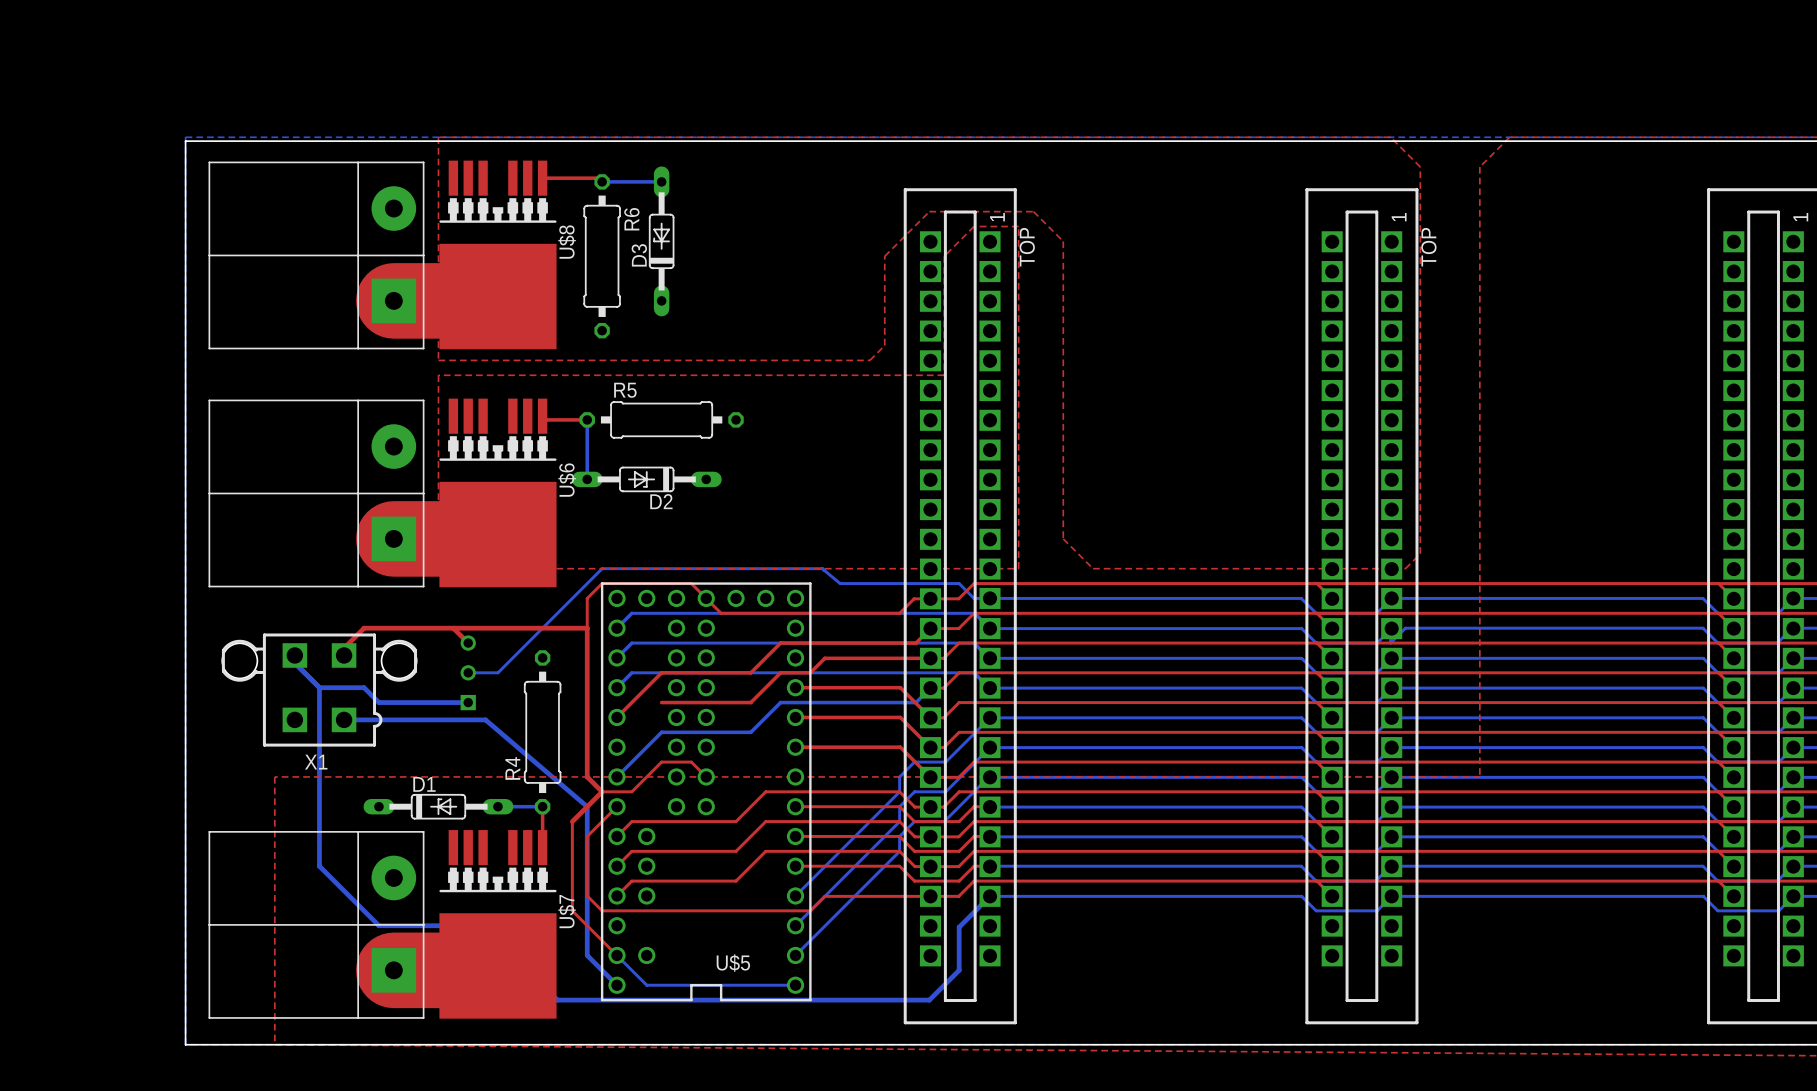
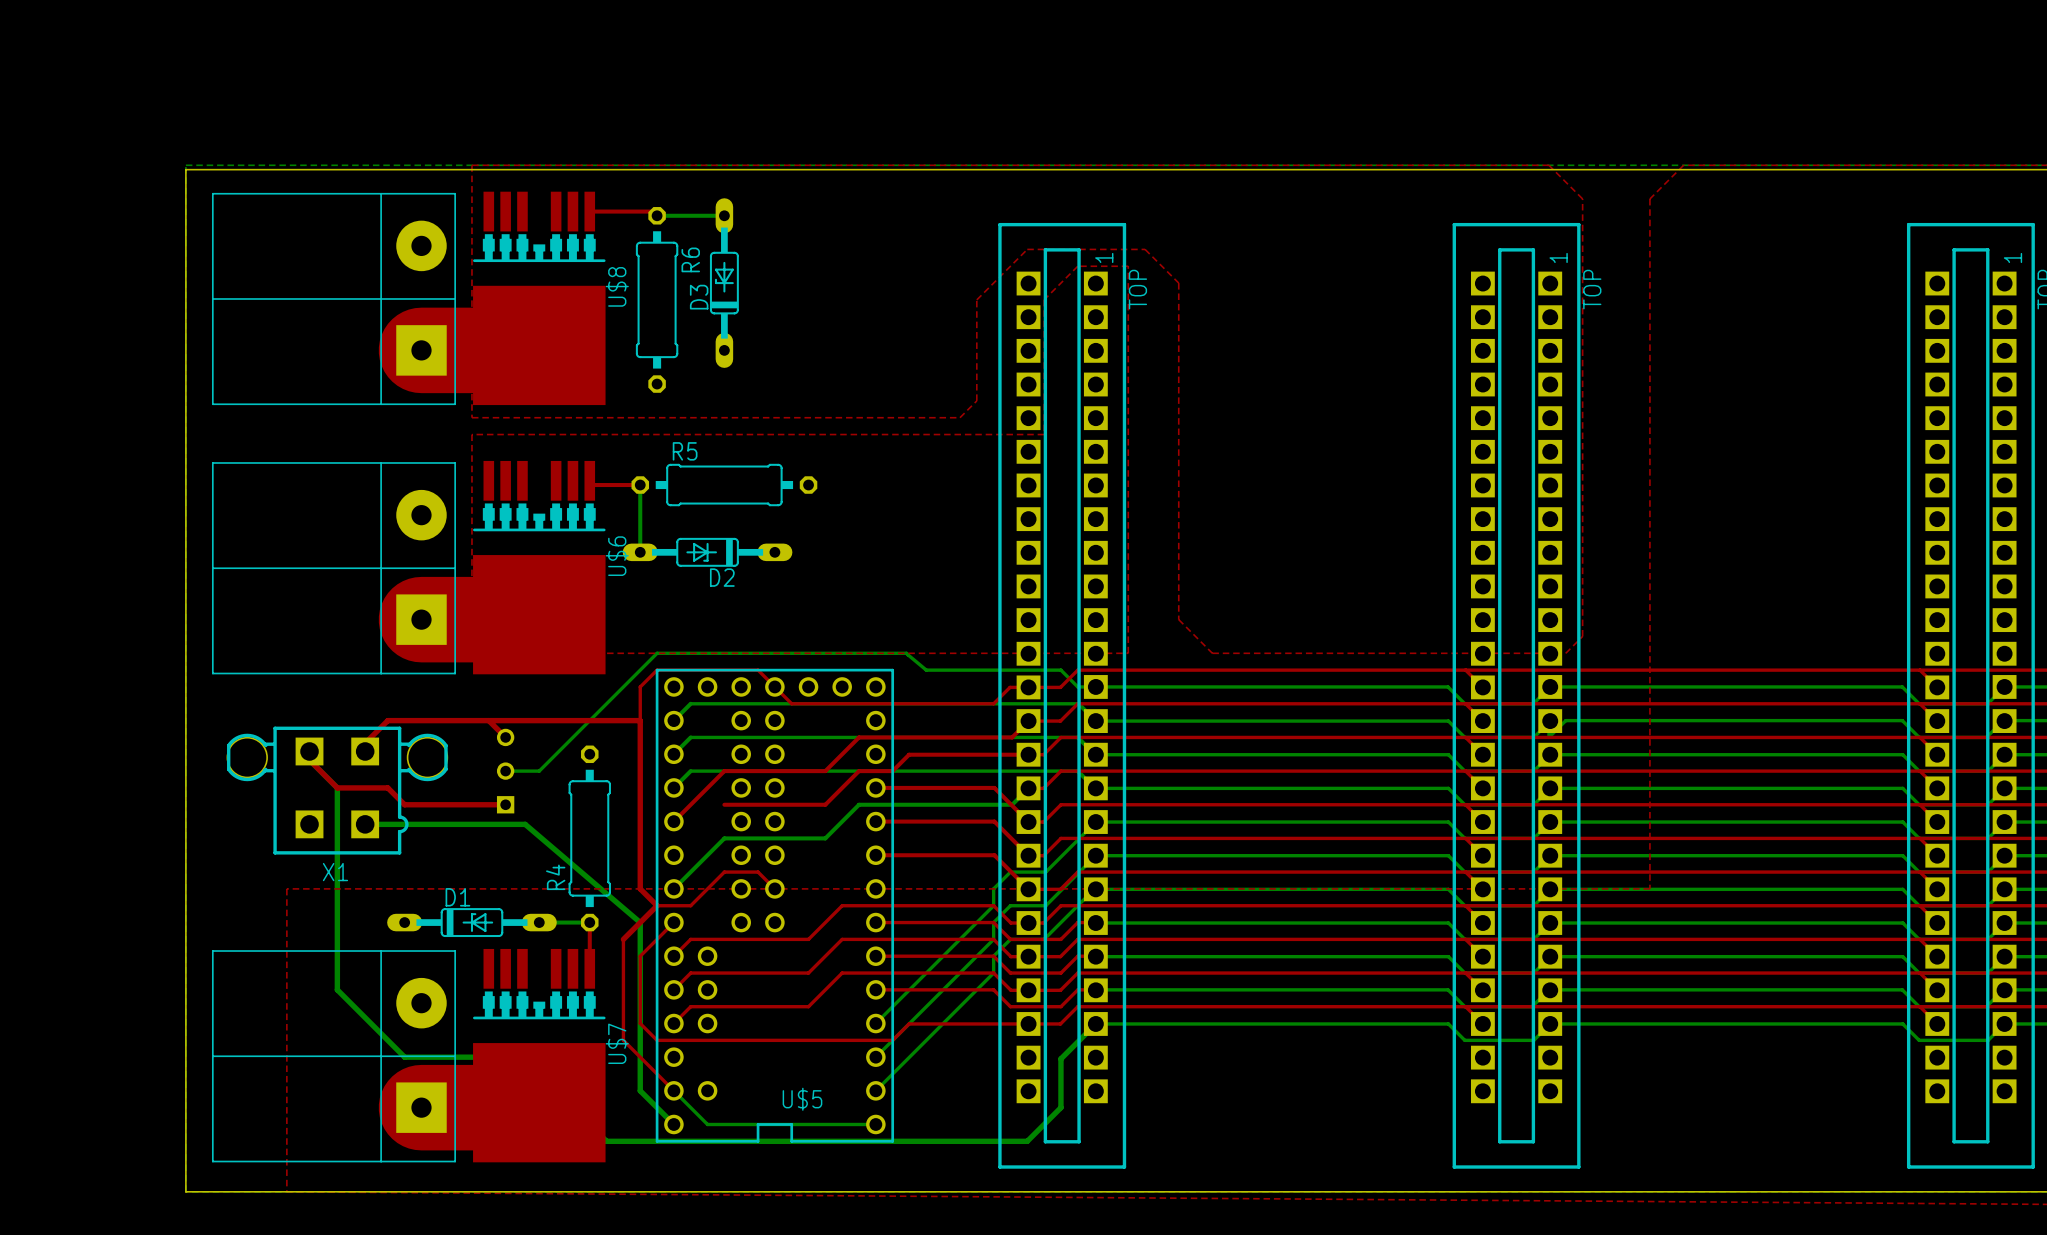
top track: none -> (309, 751) (309, 760) (337, 787) (387, 787) (404, 804) (505, 804)
bottom track: (319, 687) (364, 687) (378, 702) (468, 702) -> none

